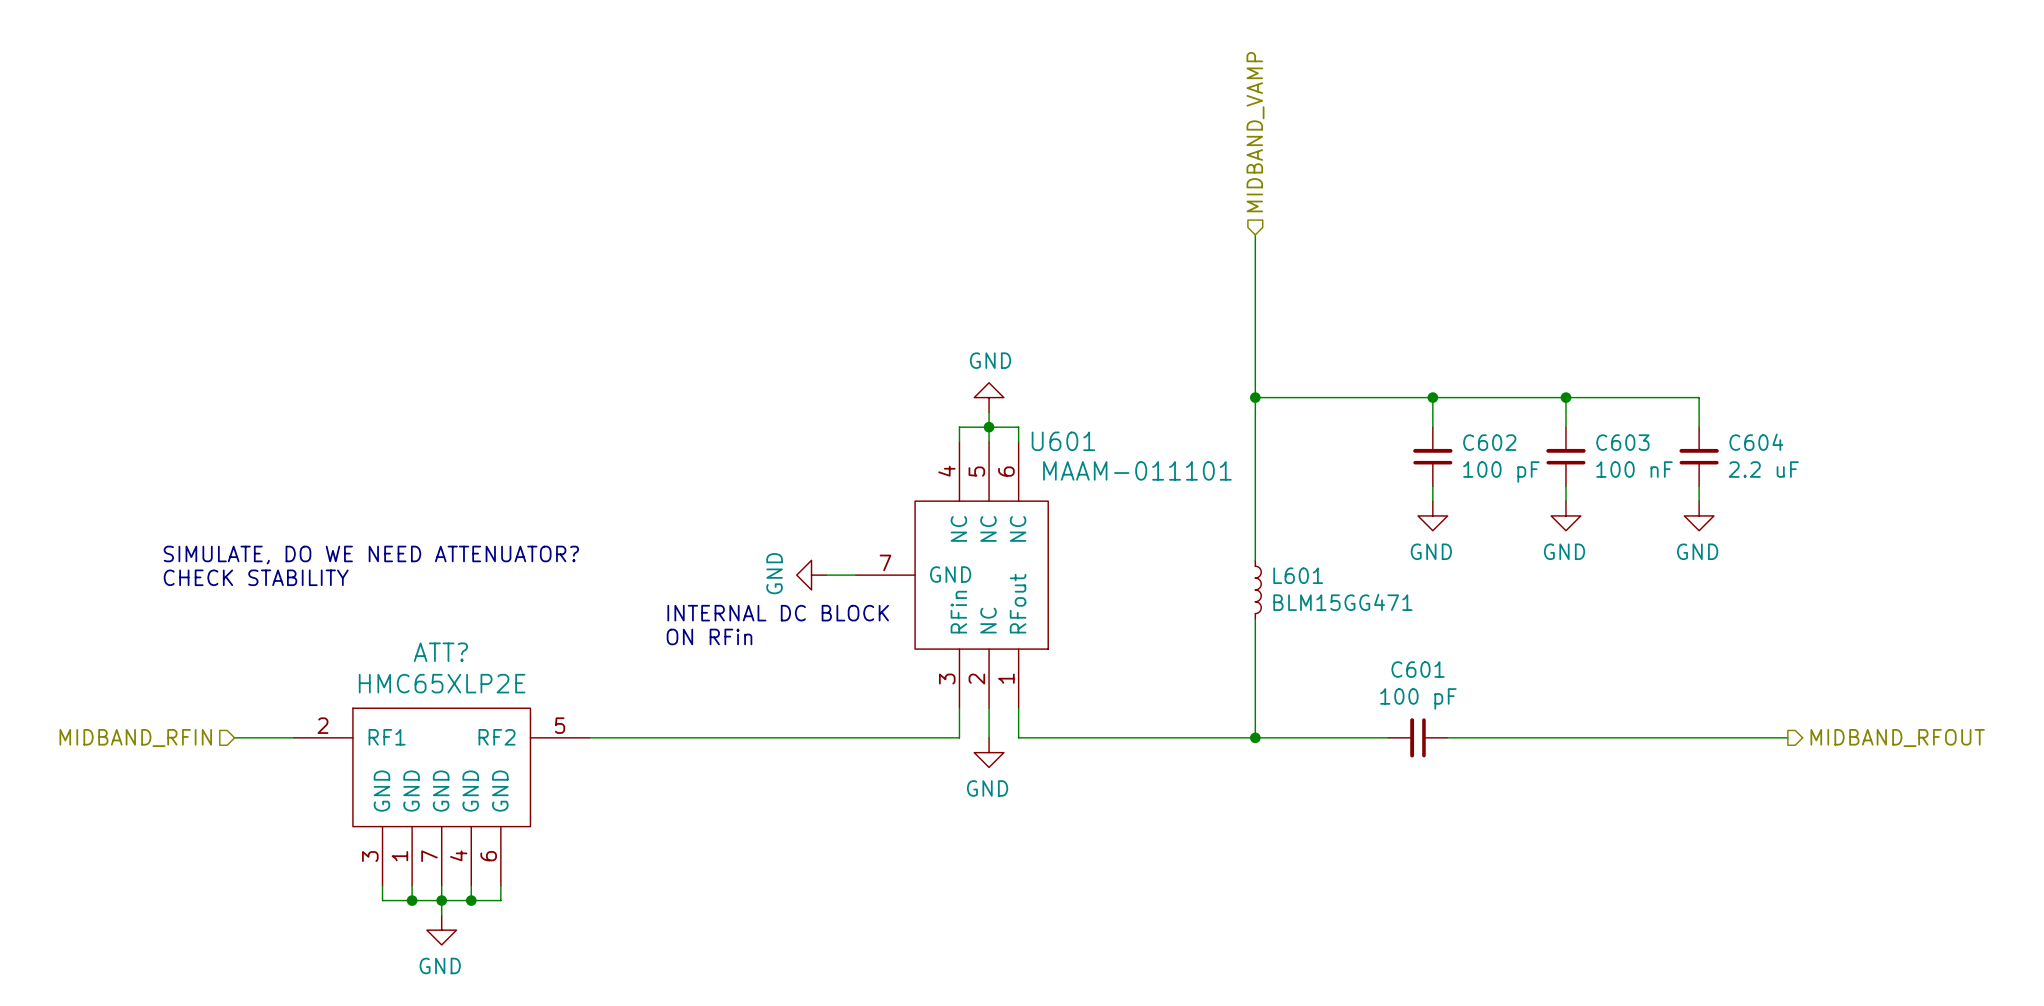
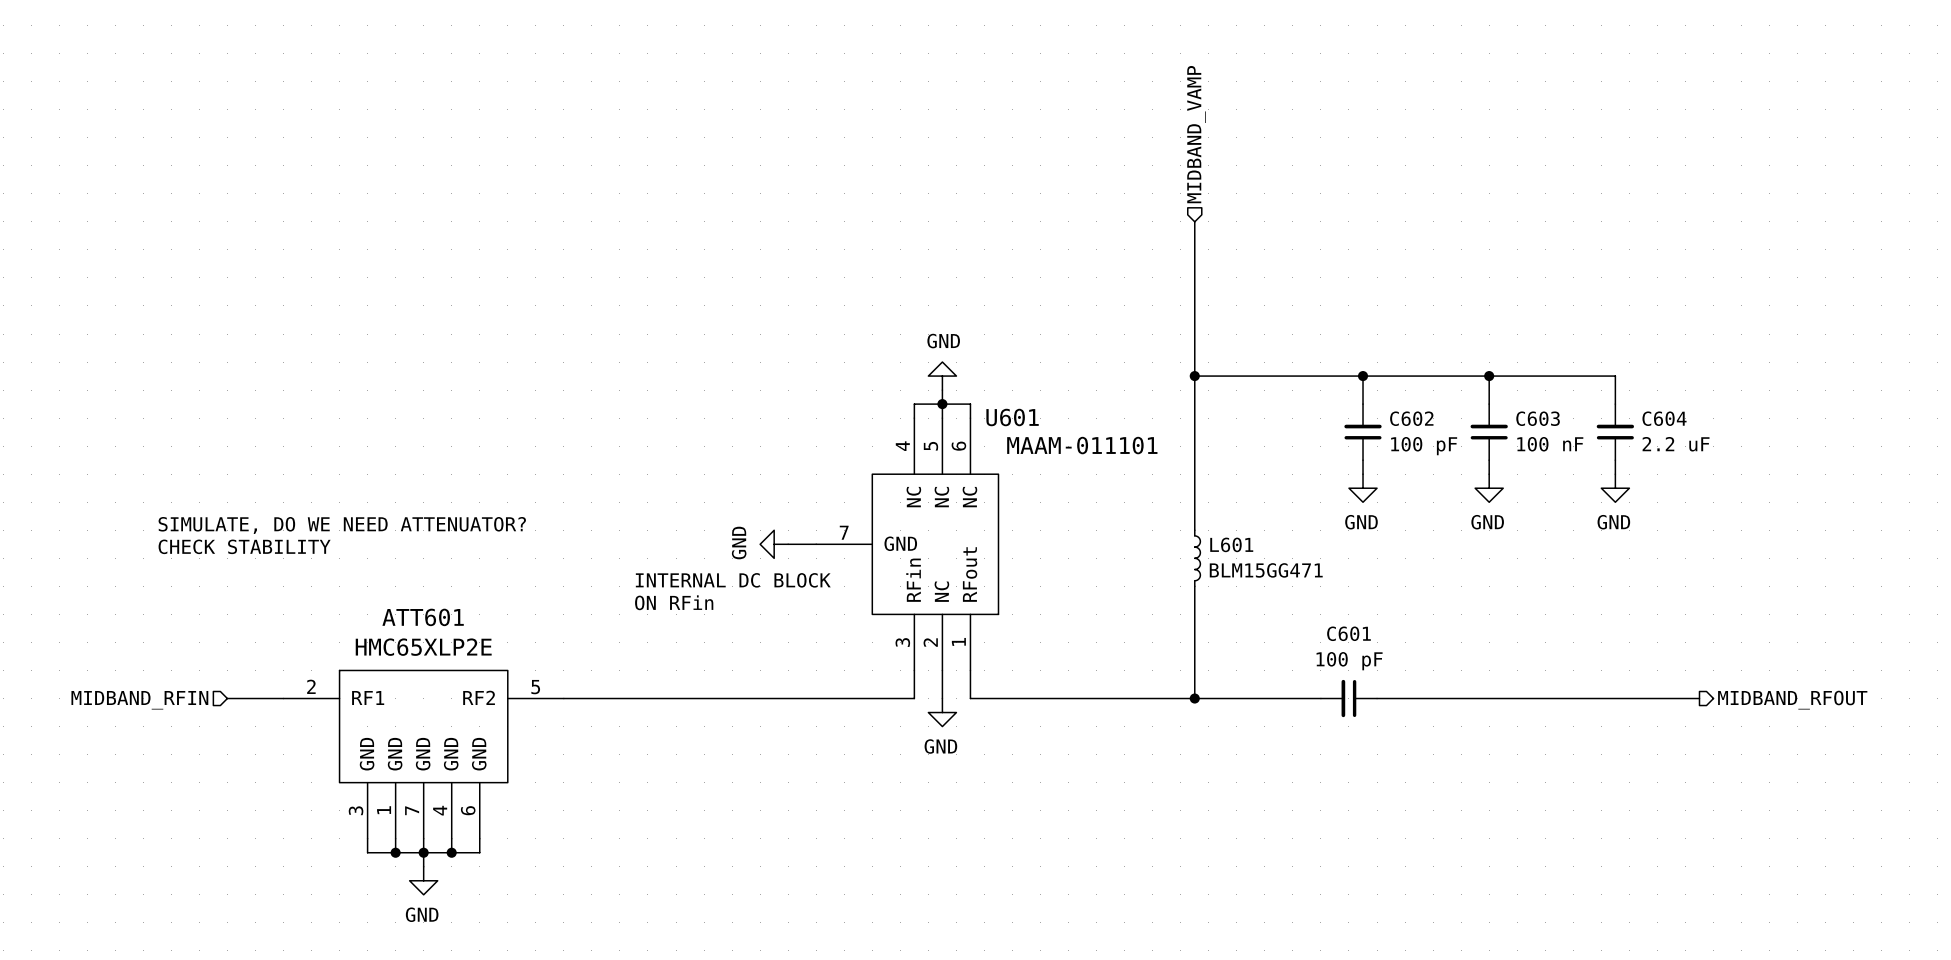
ATT? name: ATT? (440, 652) -> ATT601 (423, 617)

